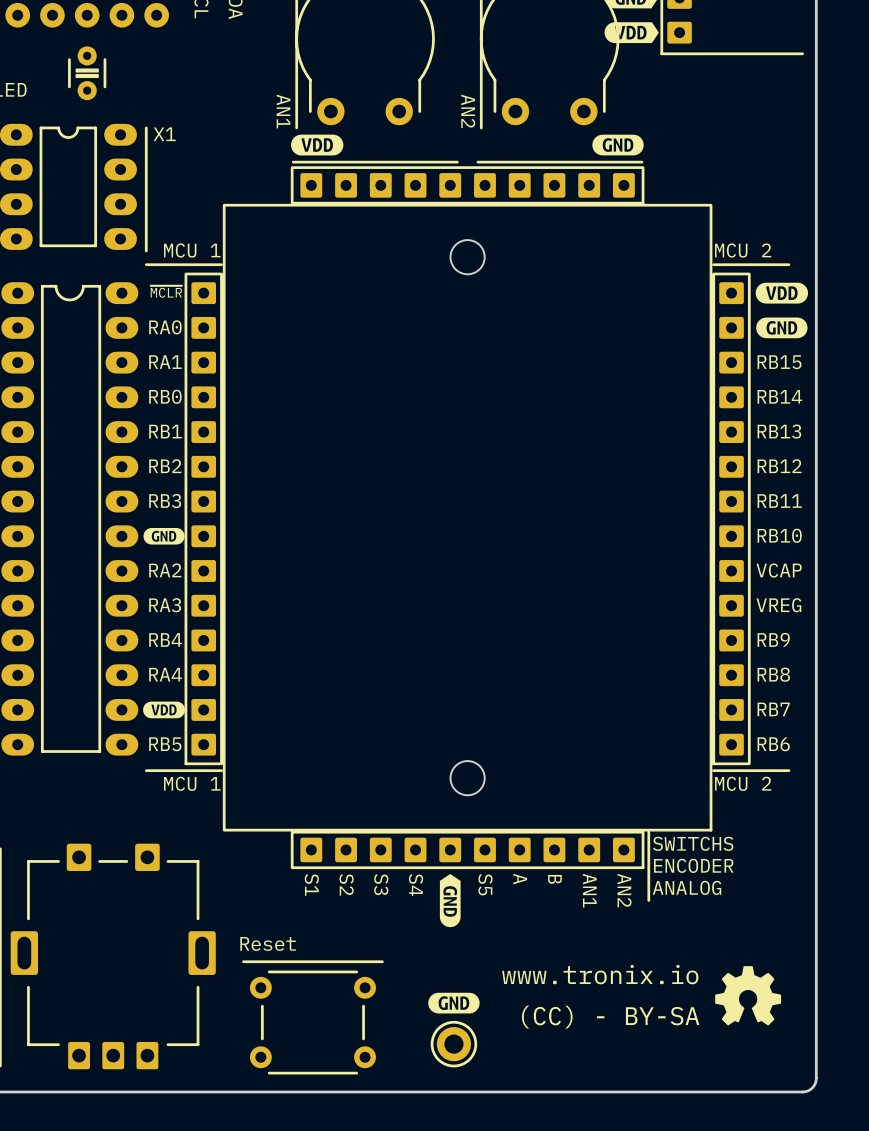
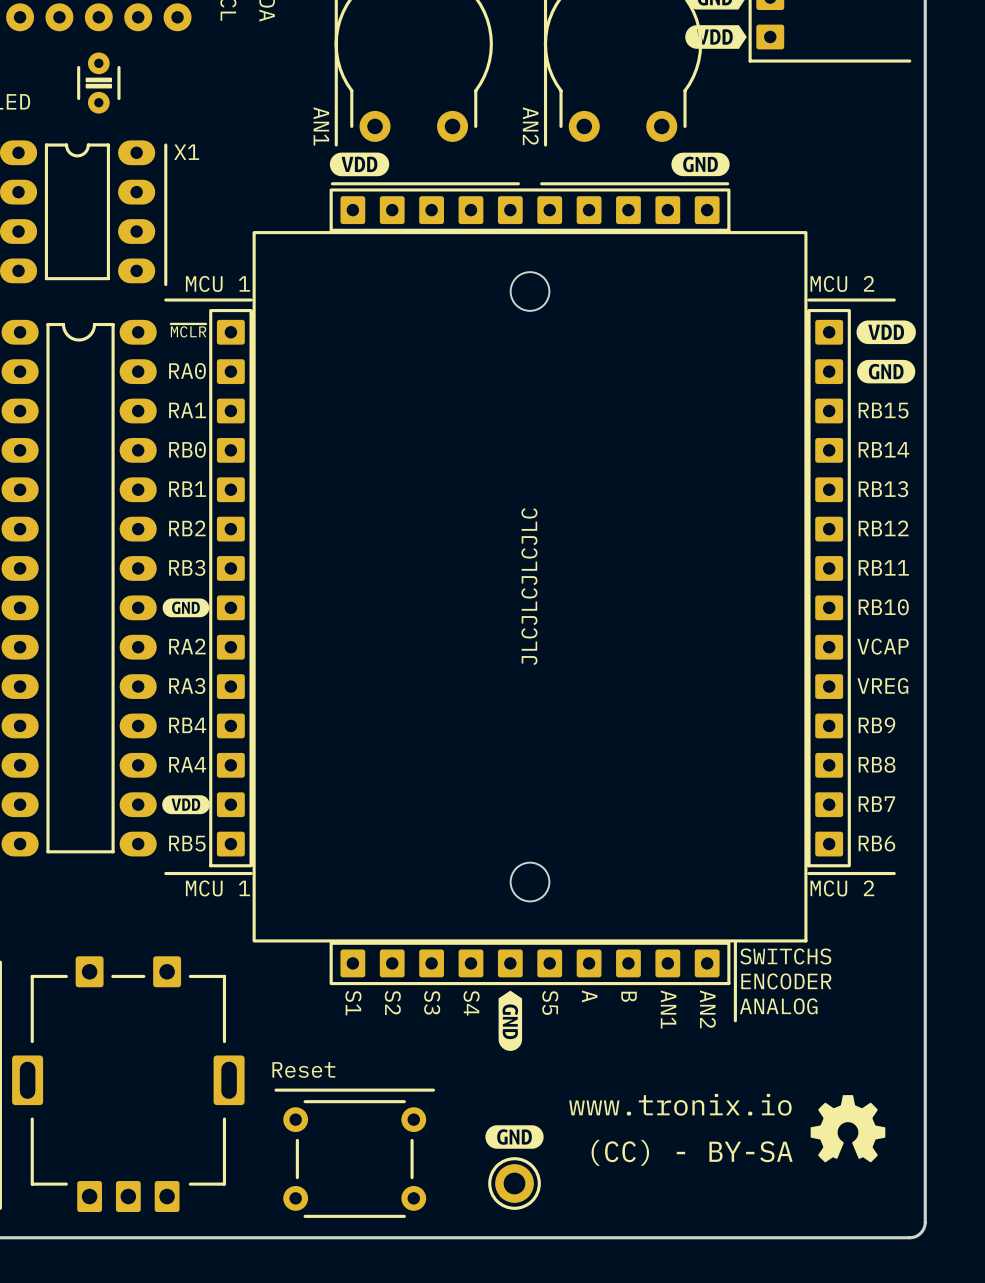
text: none -> JLCJLCJLCJLC (529, 586)

